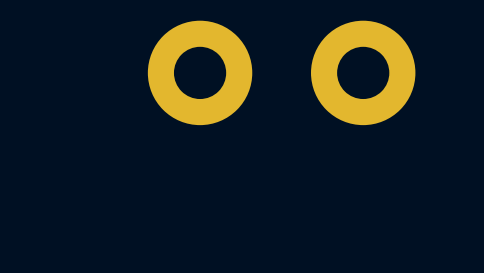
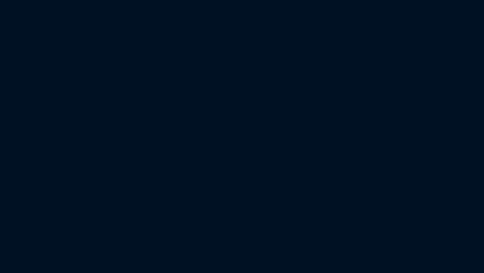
part: (281, 72) -> none

